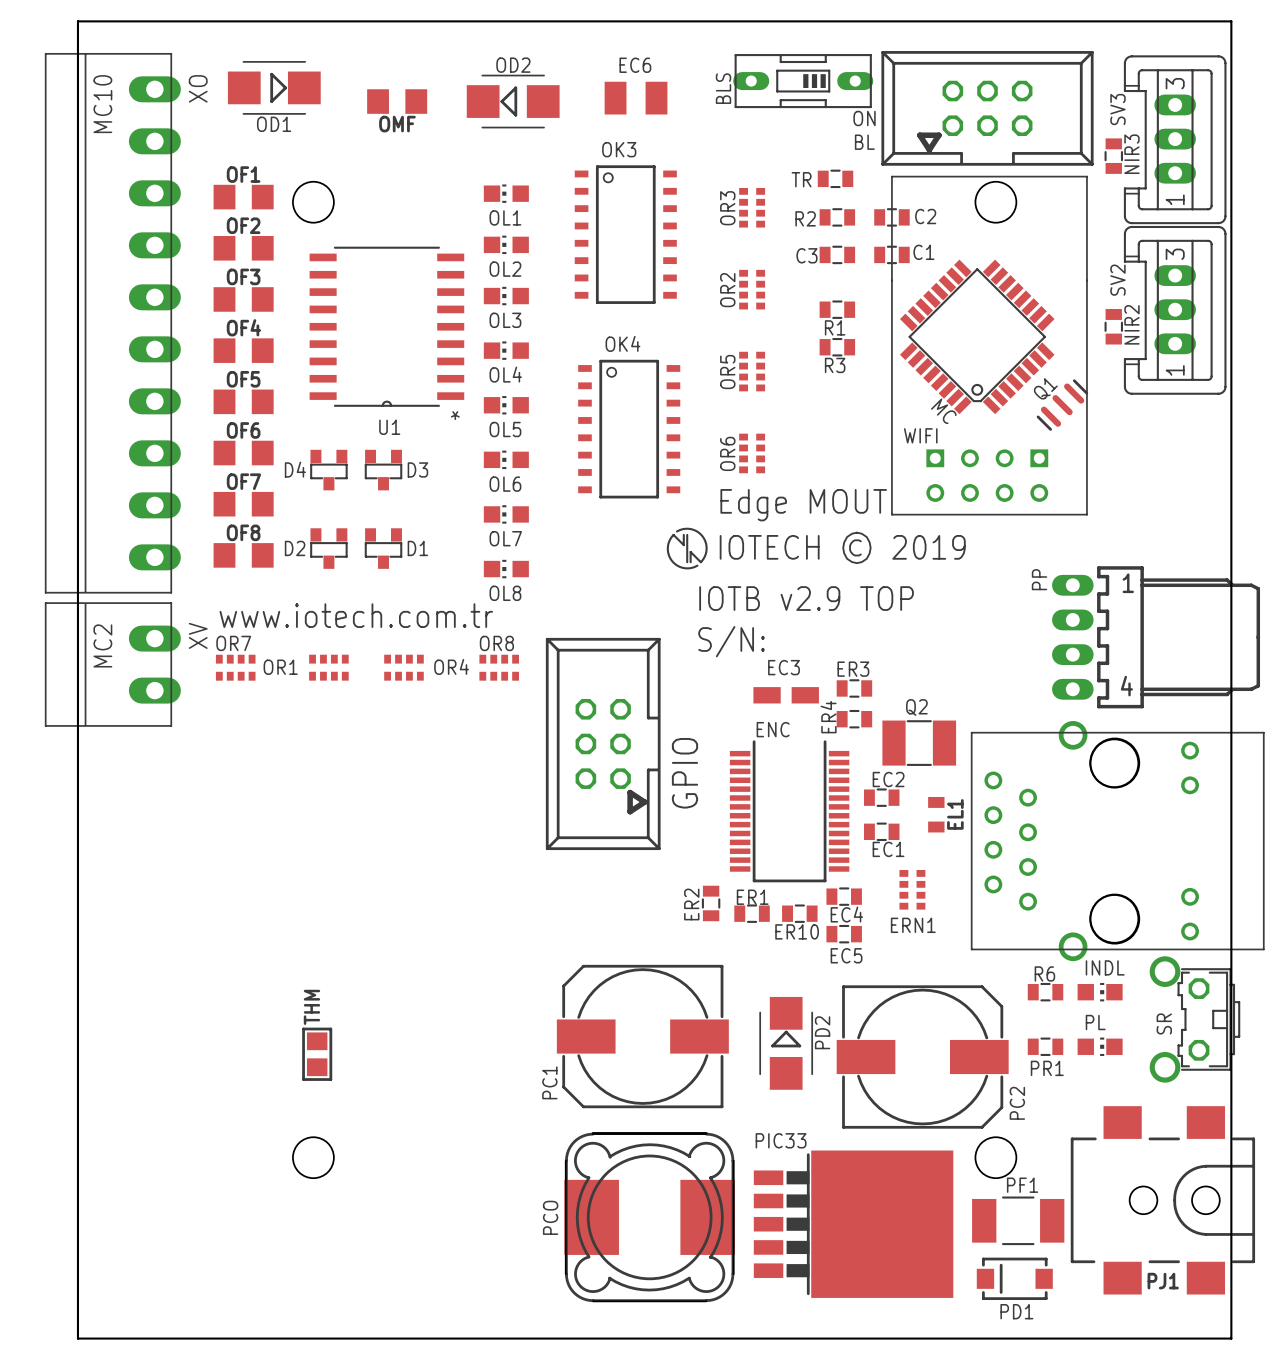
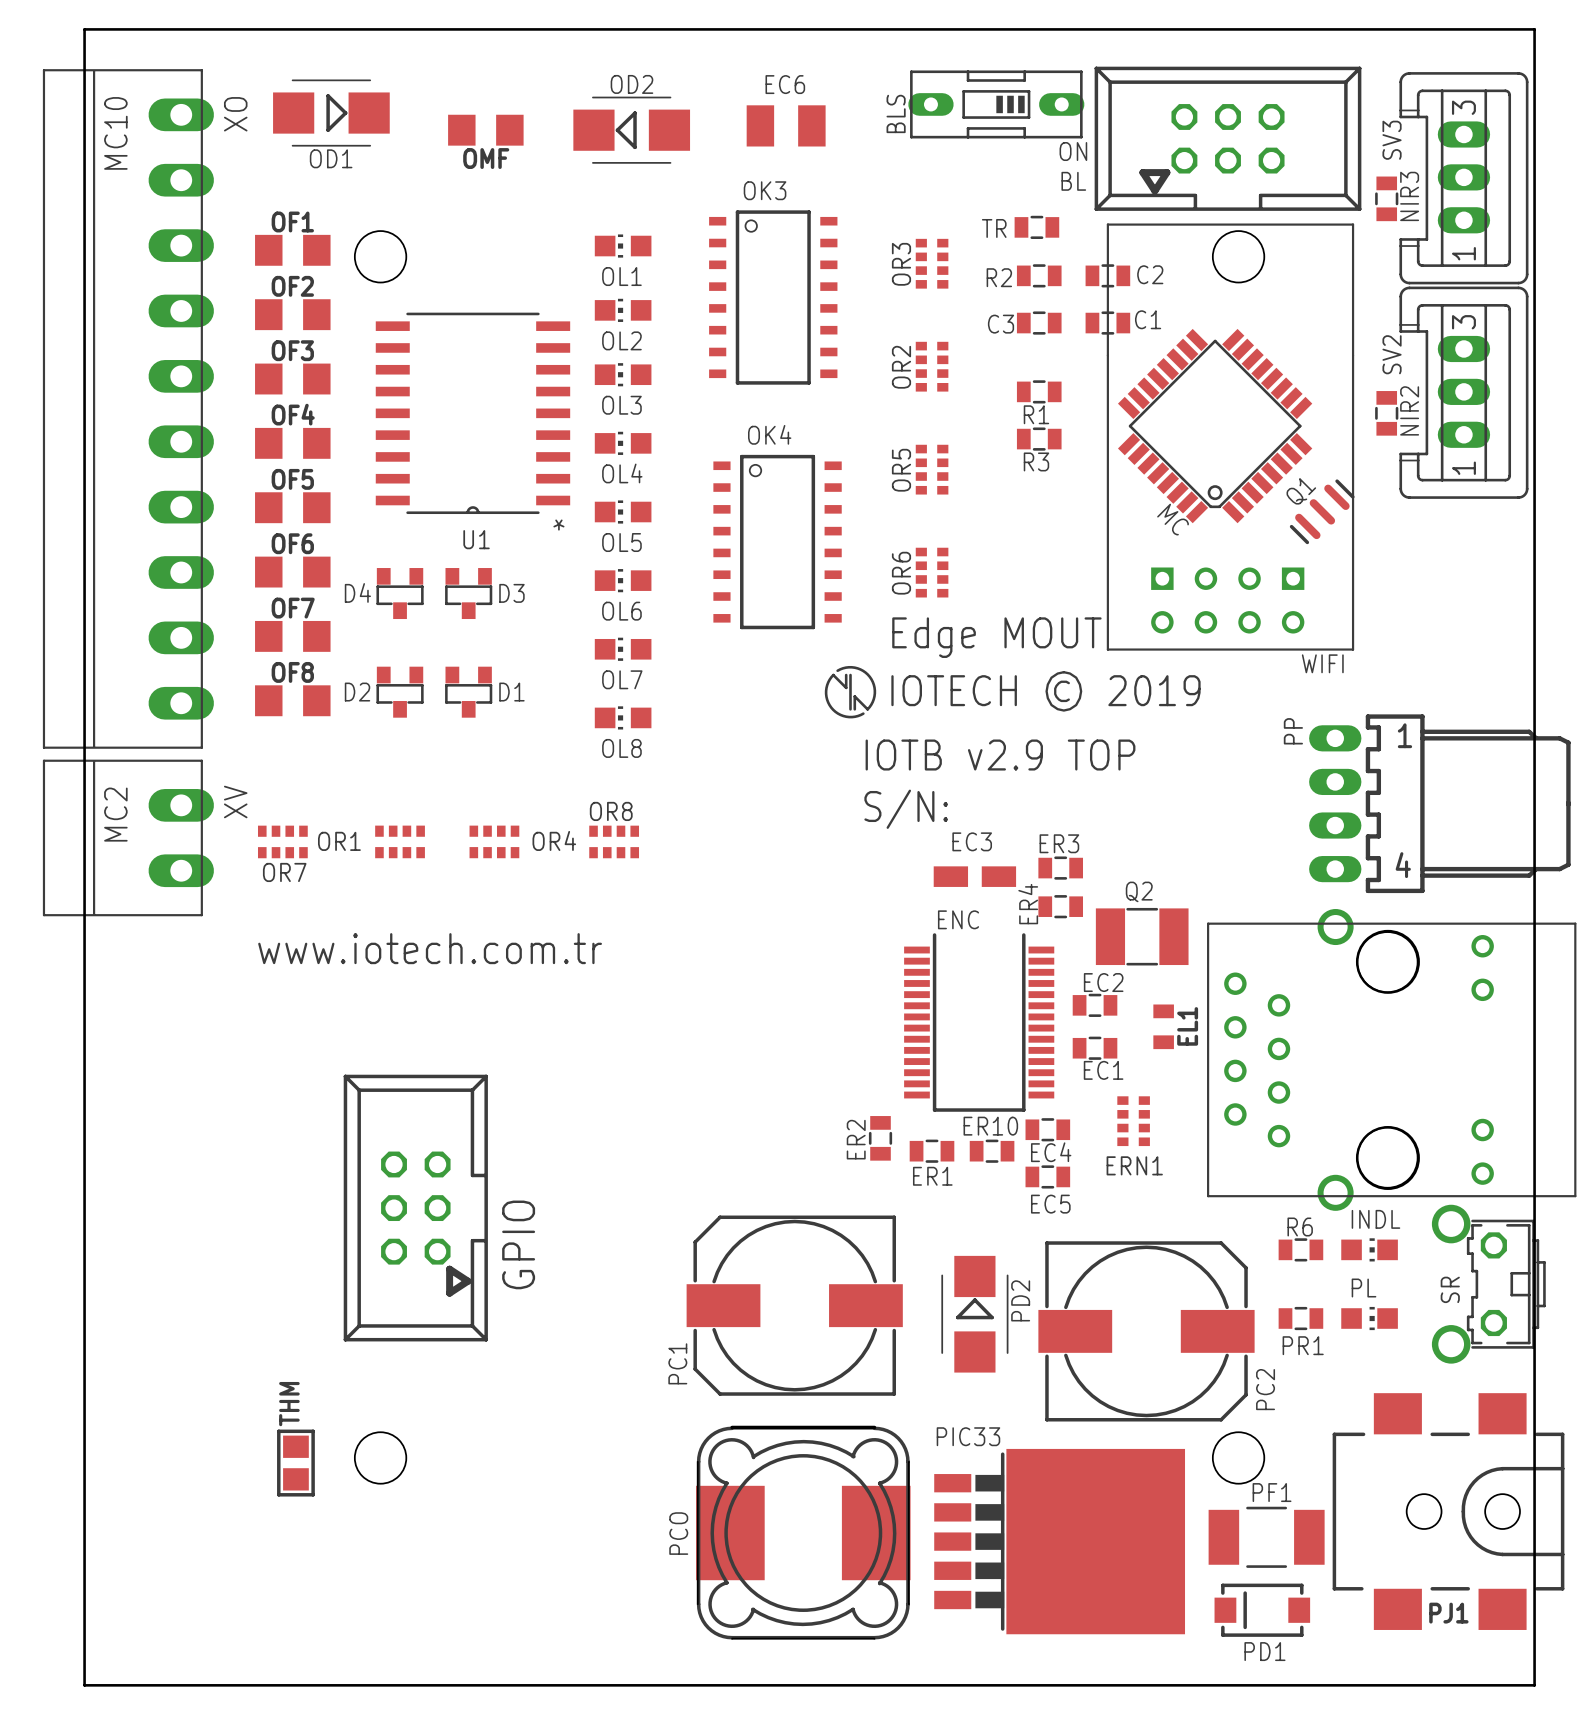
WIFI name position: WIFI (920, 435) -> WIFI (1322, 663)
text position: www.iotech.com.tr (356, 615) -> www.iotech.com.tr (430, 948)
OR7 name position: OR7 (233, 643) -> OR7 (284, 872)
GPIO position: (603, 743) -> (415, 1208)
ER1 name position: ER1 (752, 897) -> ER1 (932, 1176)
ER10 name position: ER10 (797, 931) -> ER10 (990, 1126)
THM position: (317, 1054) -> (295, 1463)

